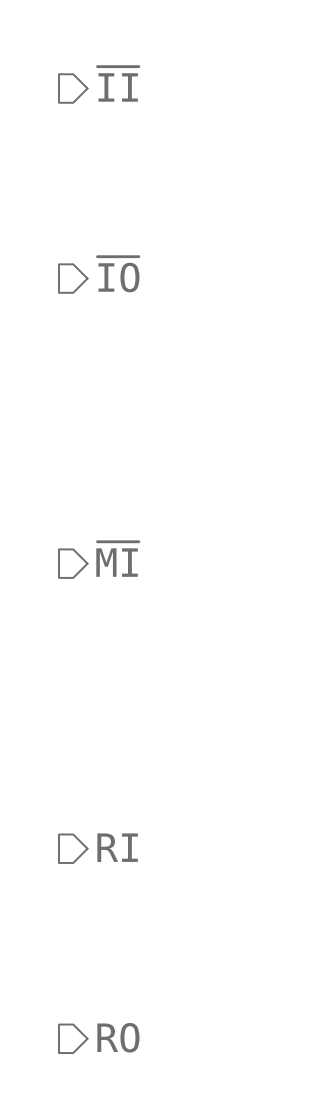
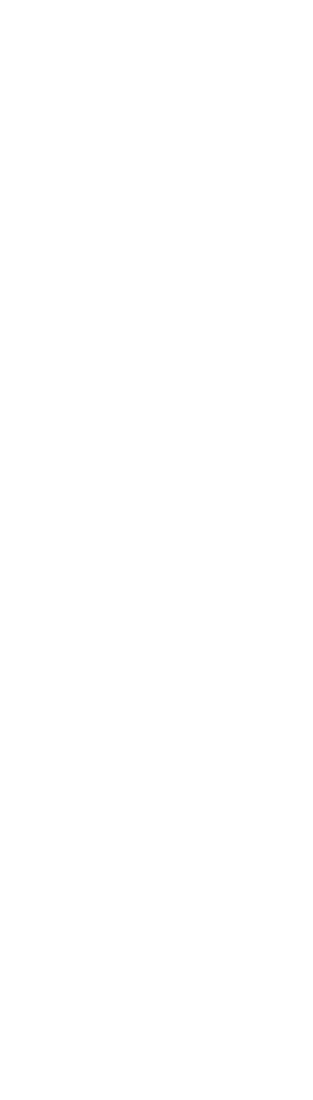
hierarchical label: ~{II} (118, 84) -> none
hierarchical label: ~{IO} (118, 274) -> none
hierarchical label: ~{MI} (117, 559) -> none
hierarchical label: RI (117, 847) -> none
hierarchical label: RO (118, 1037) -> none

